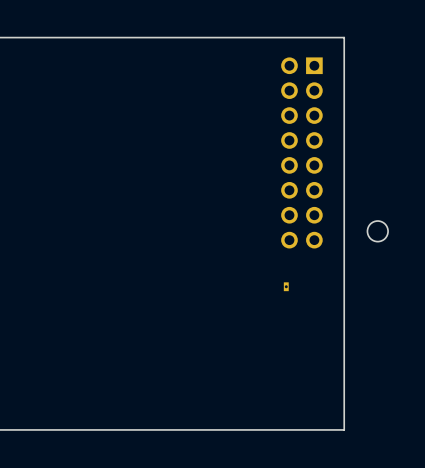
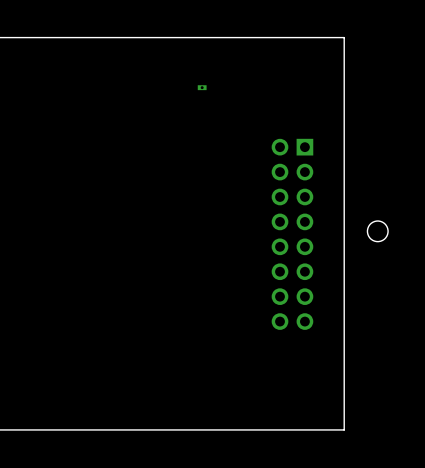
part position: (301, 152) -> (292, 234)
part rotation: 0° (286, 286) -> 90° clockwise (202, 87)
part position: (286, 286) -> (202, 87)

